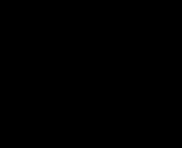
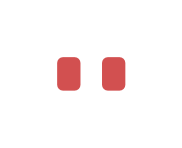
part: none -> (91, 73)

